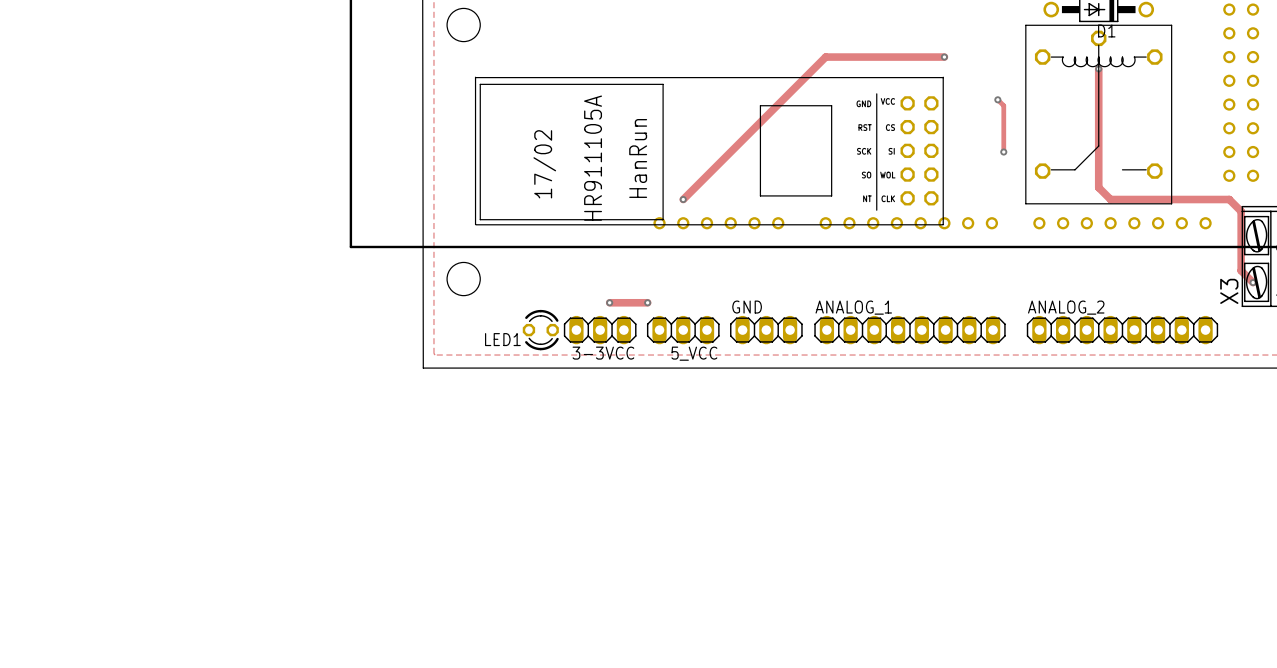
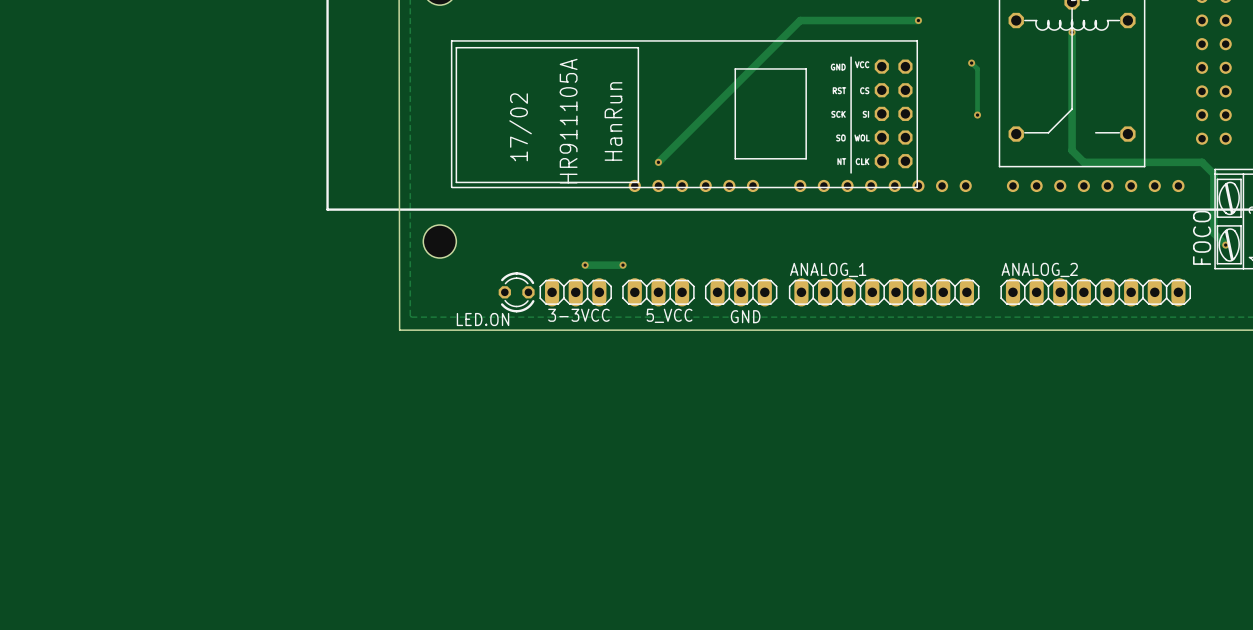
X3 name: X3 (1229, 291) -> FOCO (1202, 237)
GND name position: GND (747, 307) -> GND (745, 316)
LED1 name: LED1 (502, 339) -> LED.ON (483, 319)

